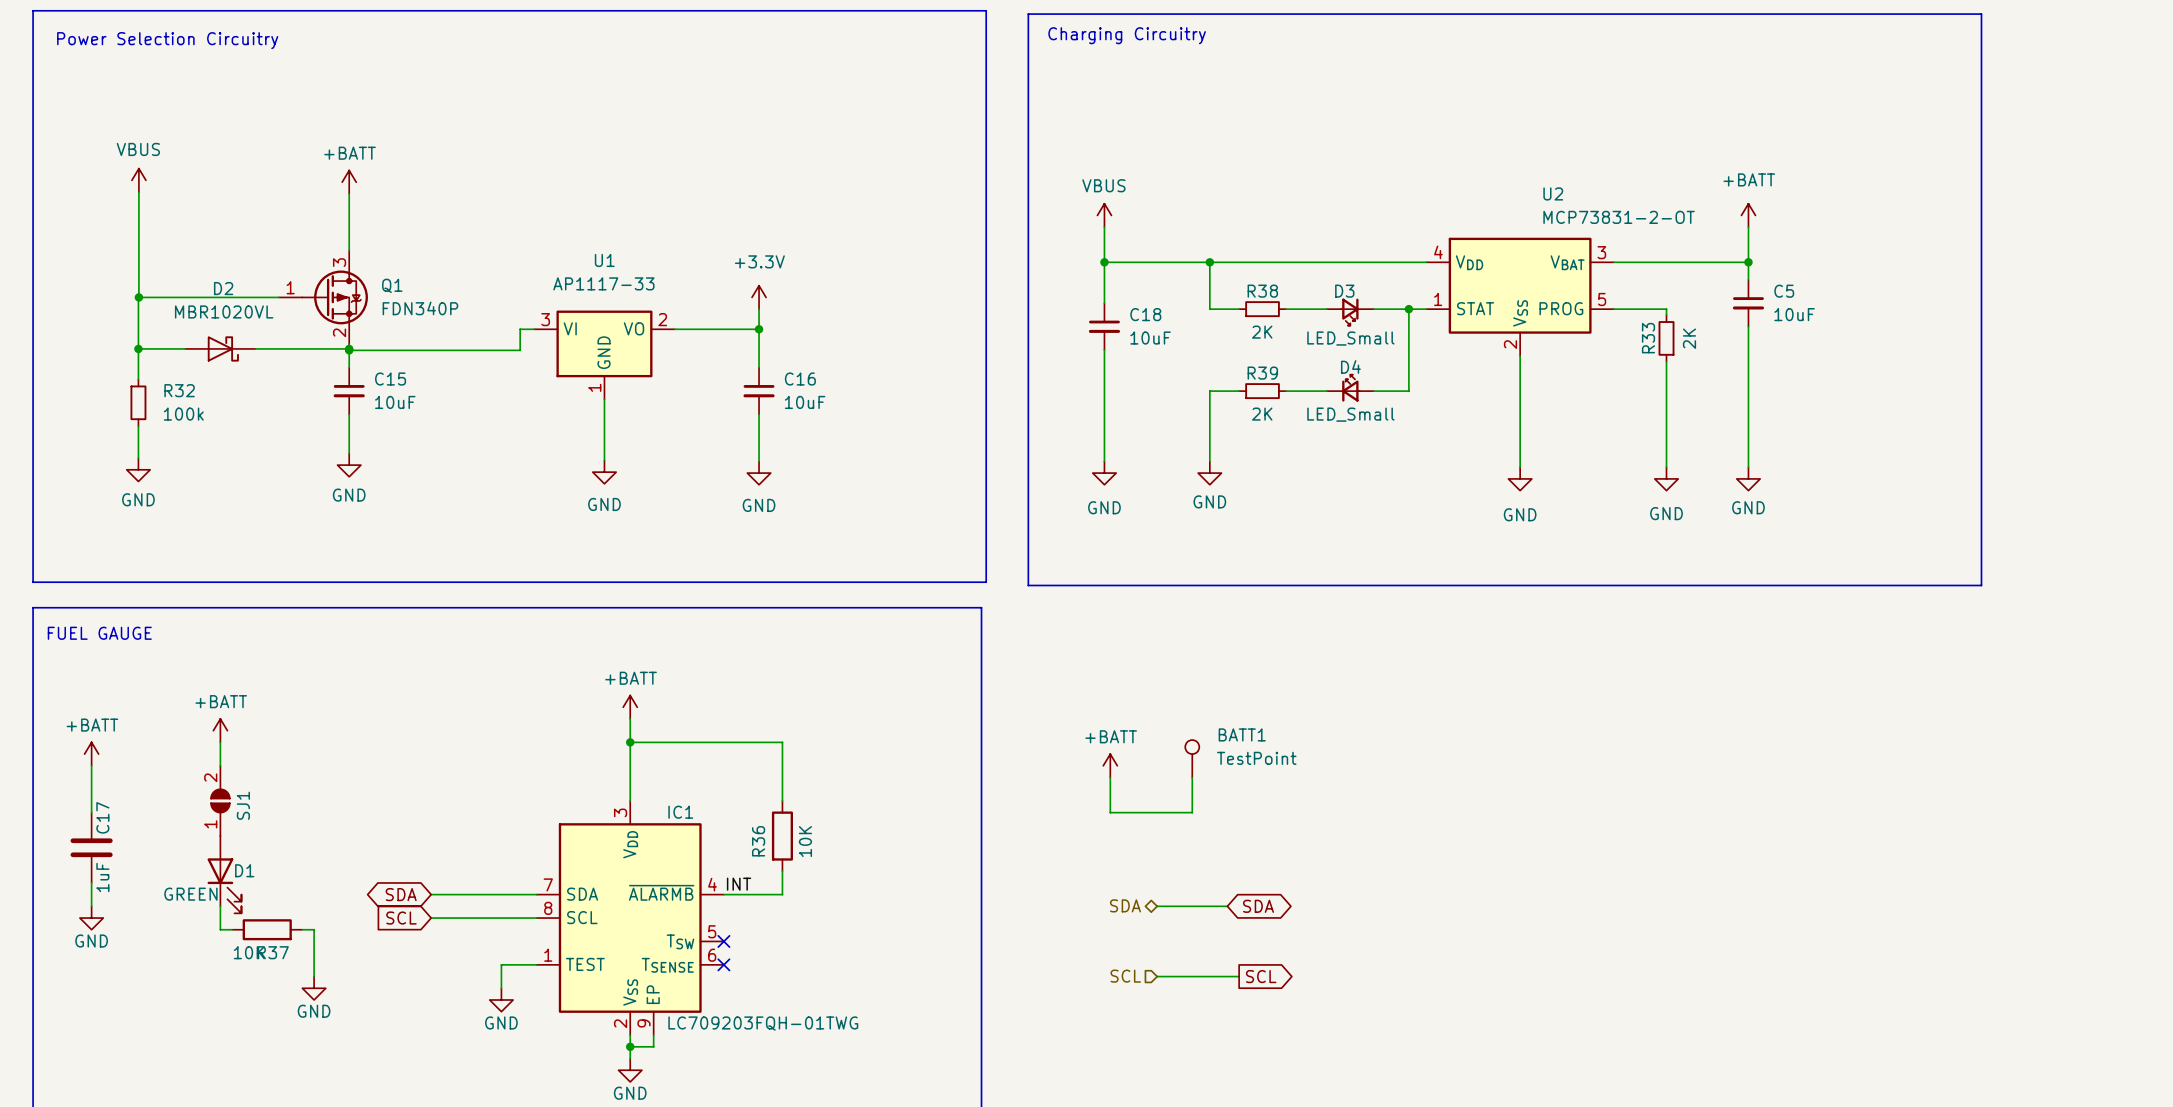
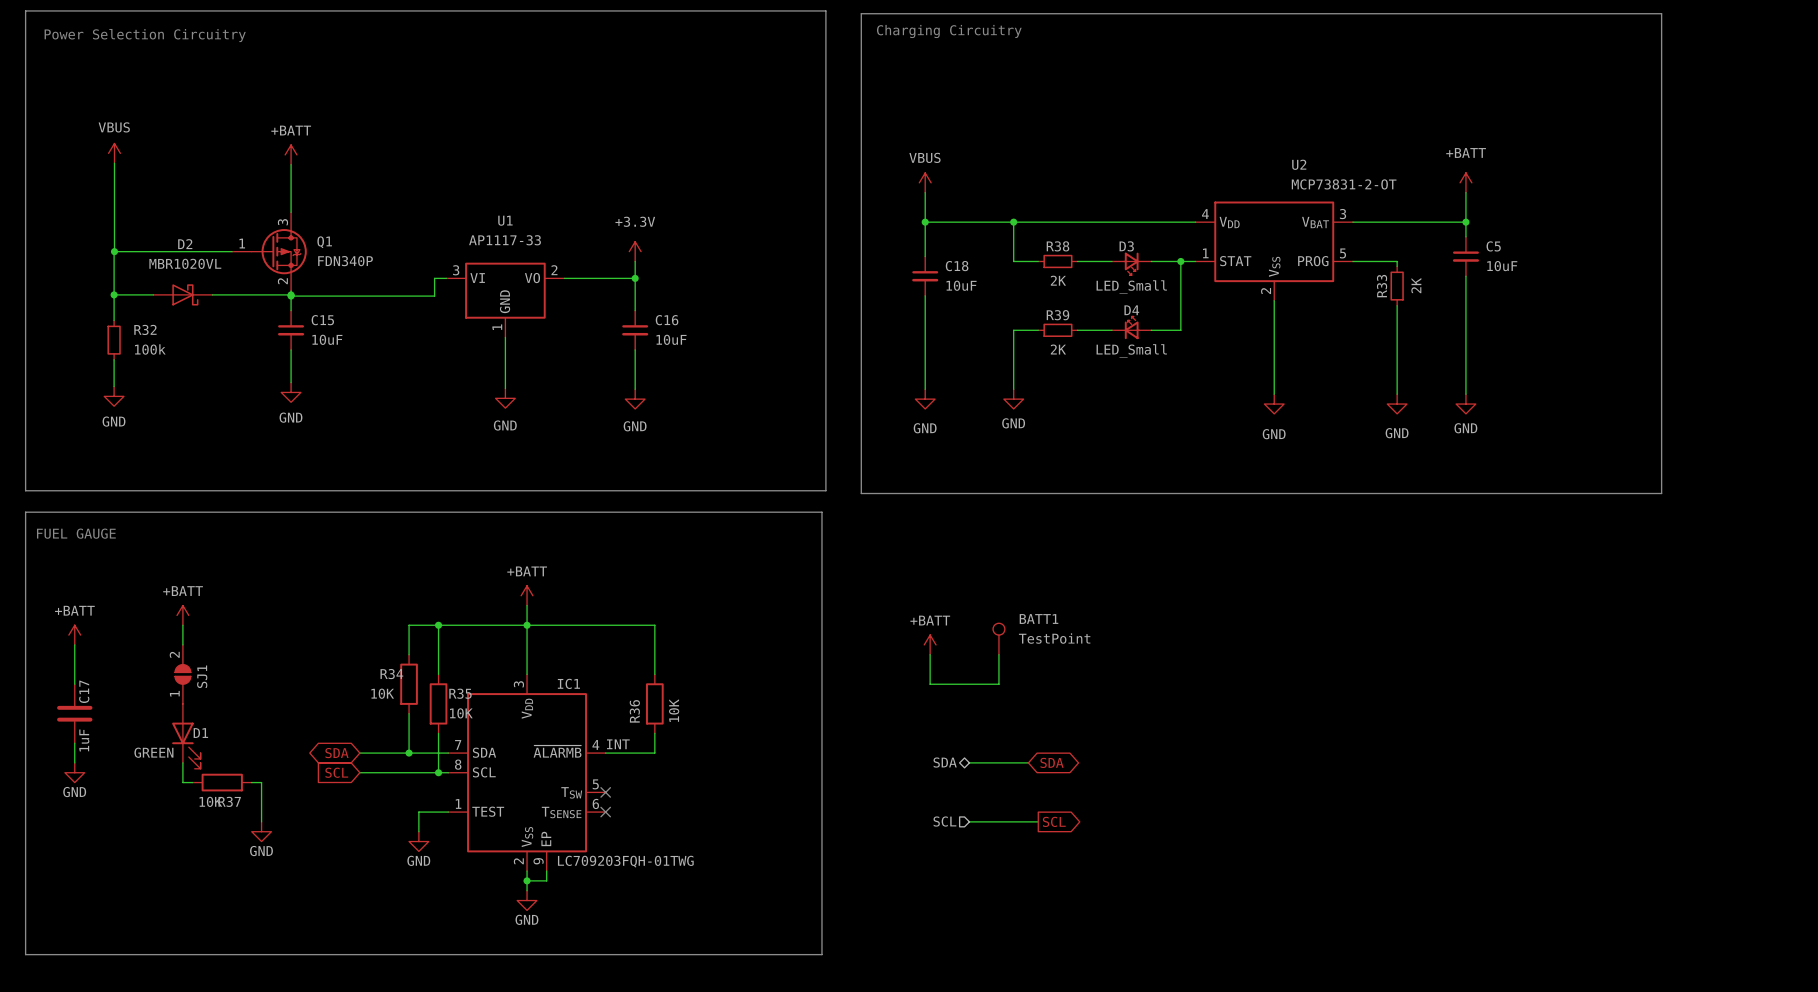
wire: none -> (438, 625) (438, 674)
junction: none -> (438, 625)
wire: none -> (527, 625) (409, 625) (409, 654)
R34: none -> 10K (409, 684)
R35: none -> 10K (438, 703)
wire: none -> (409, 713) (409, 753)
wire: none -> (438, 733) (438, 772)
junction: none -> (409, 753)
junction: none -> (438, 772)

